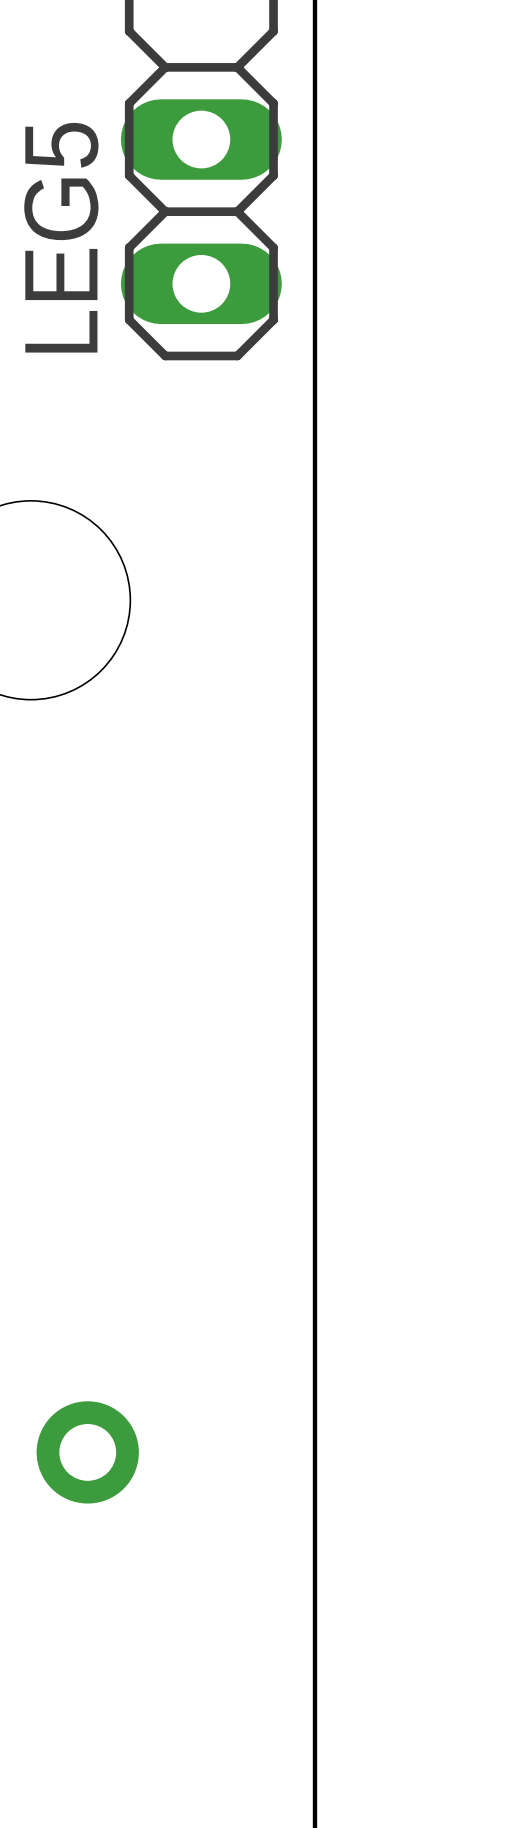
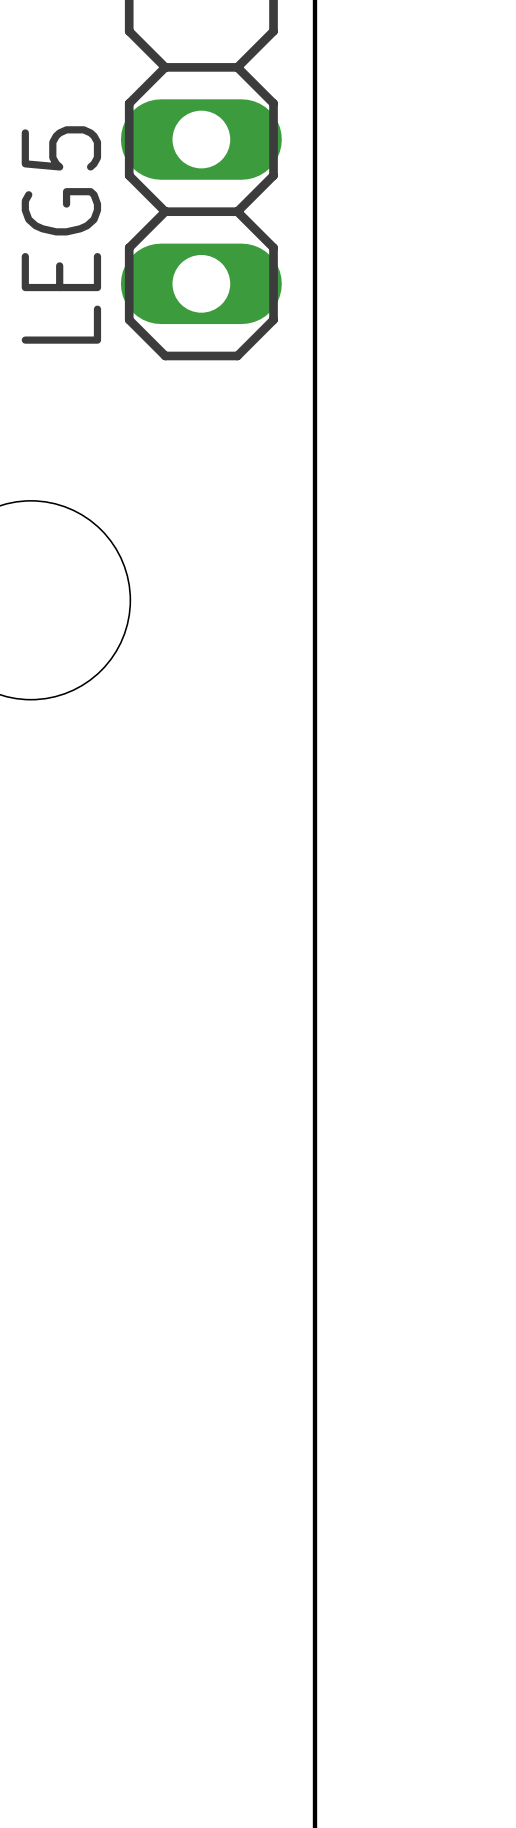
via: (87, 1452) -> none

